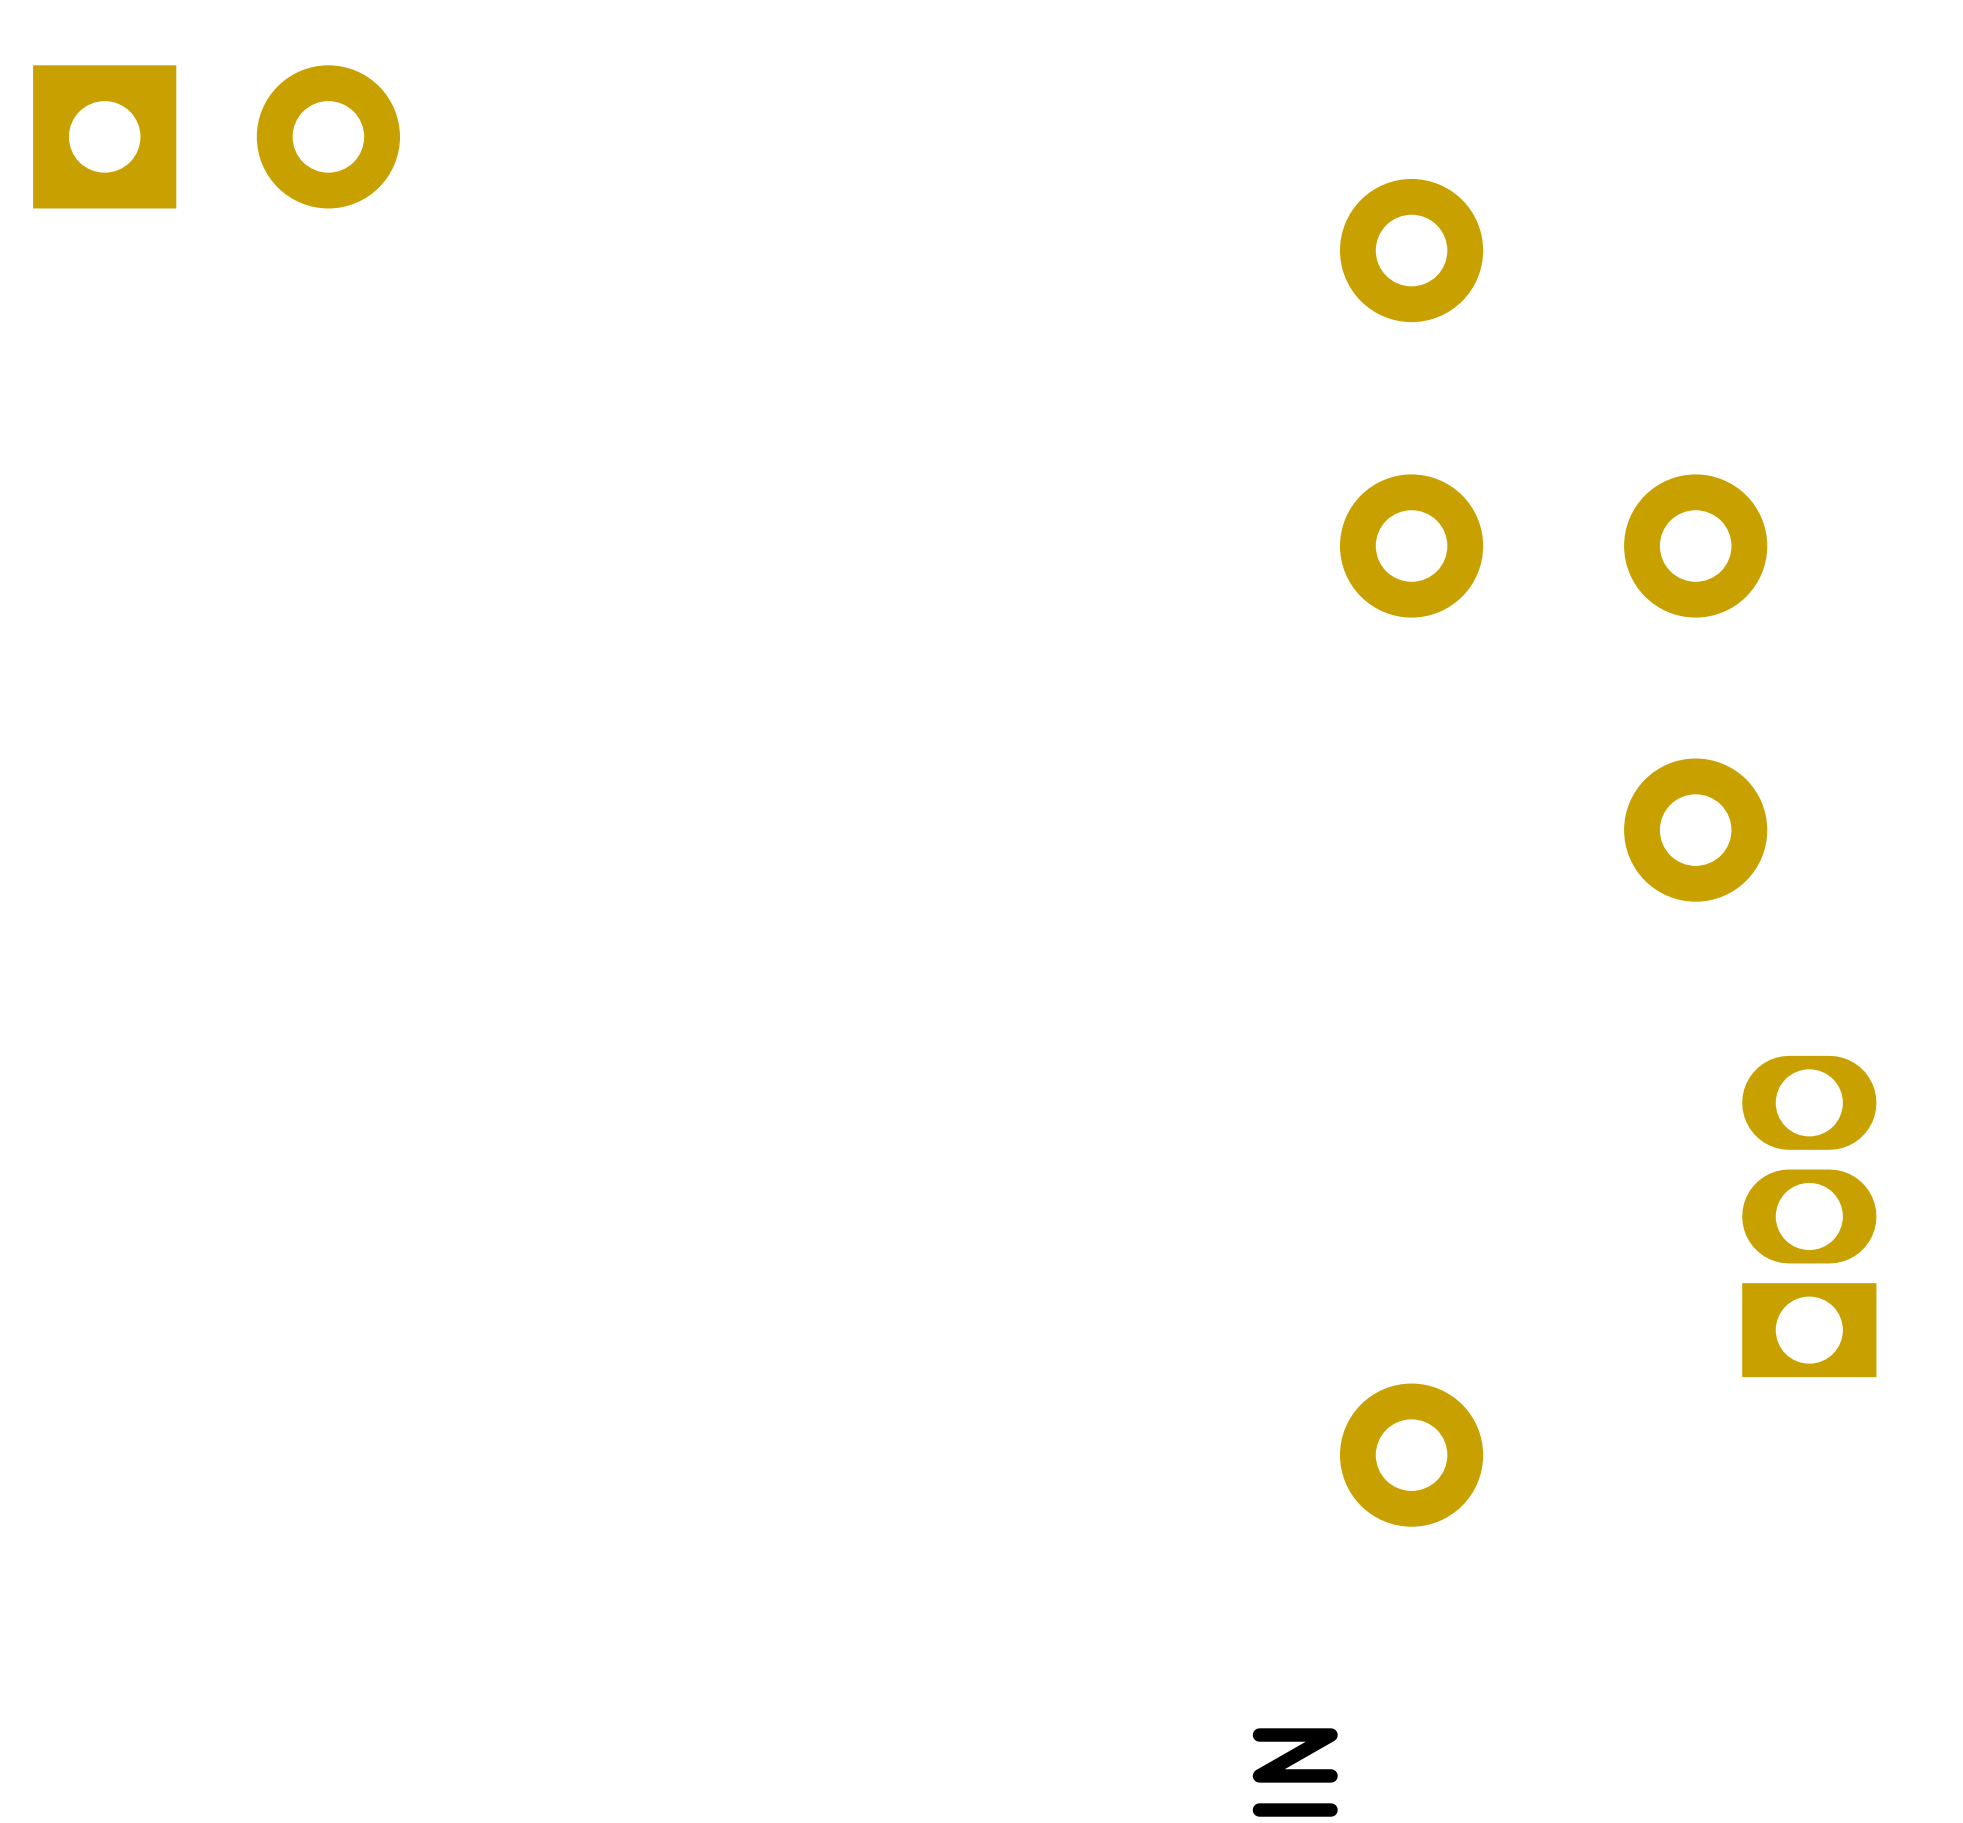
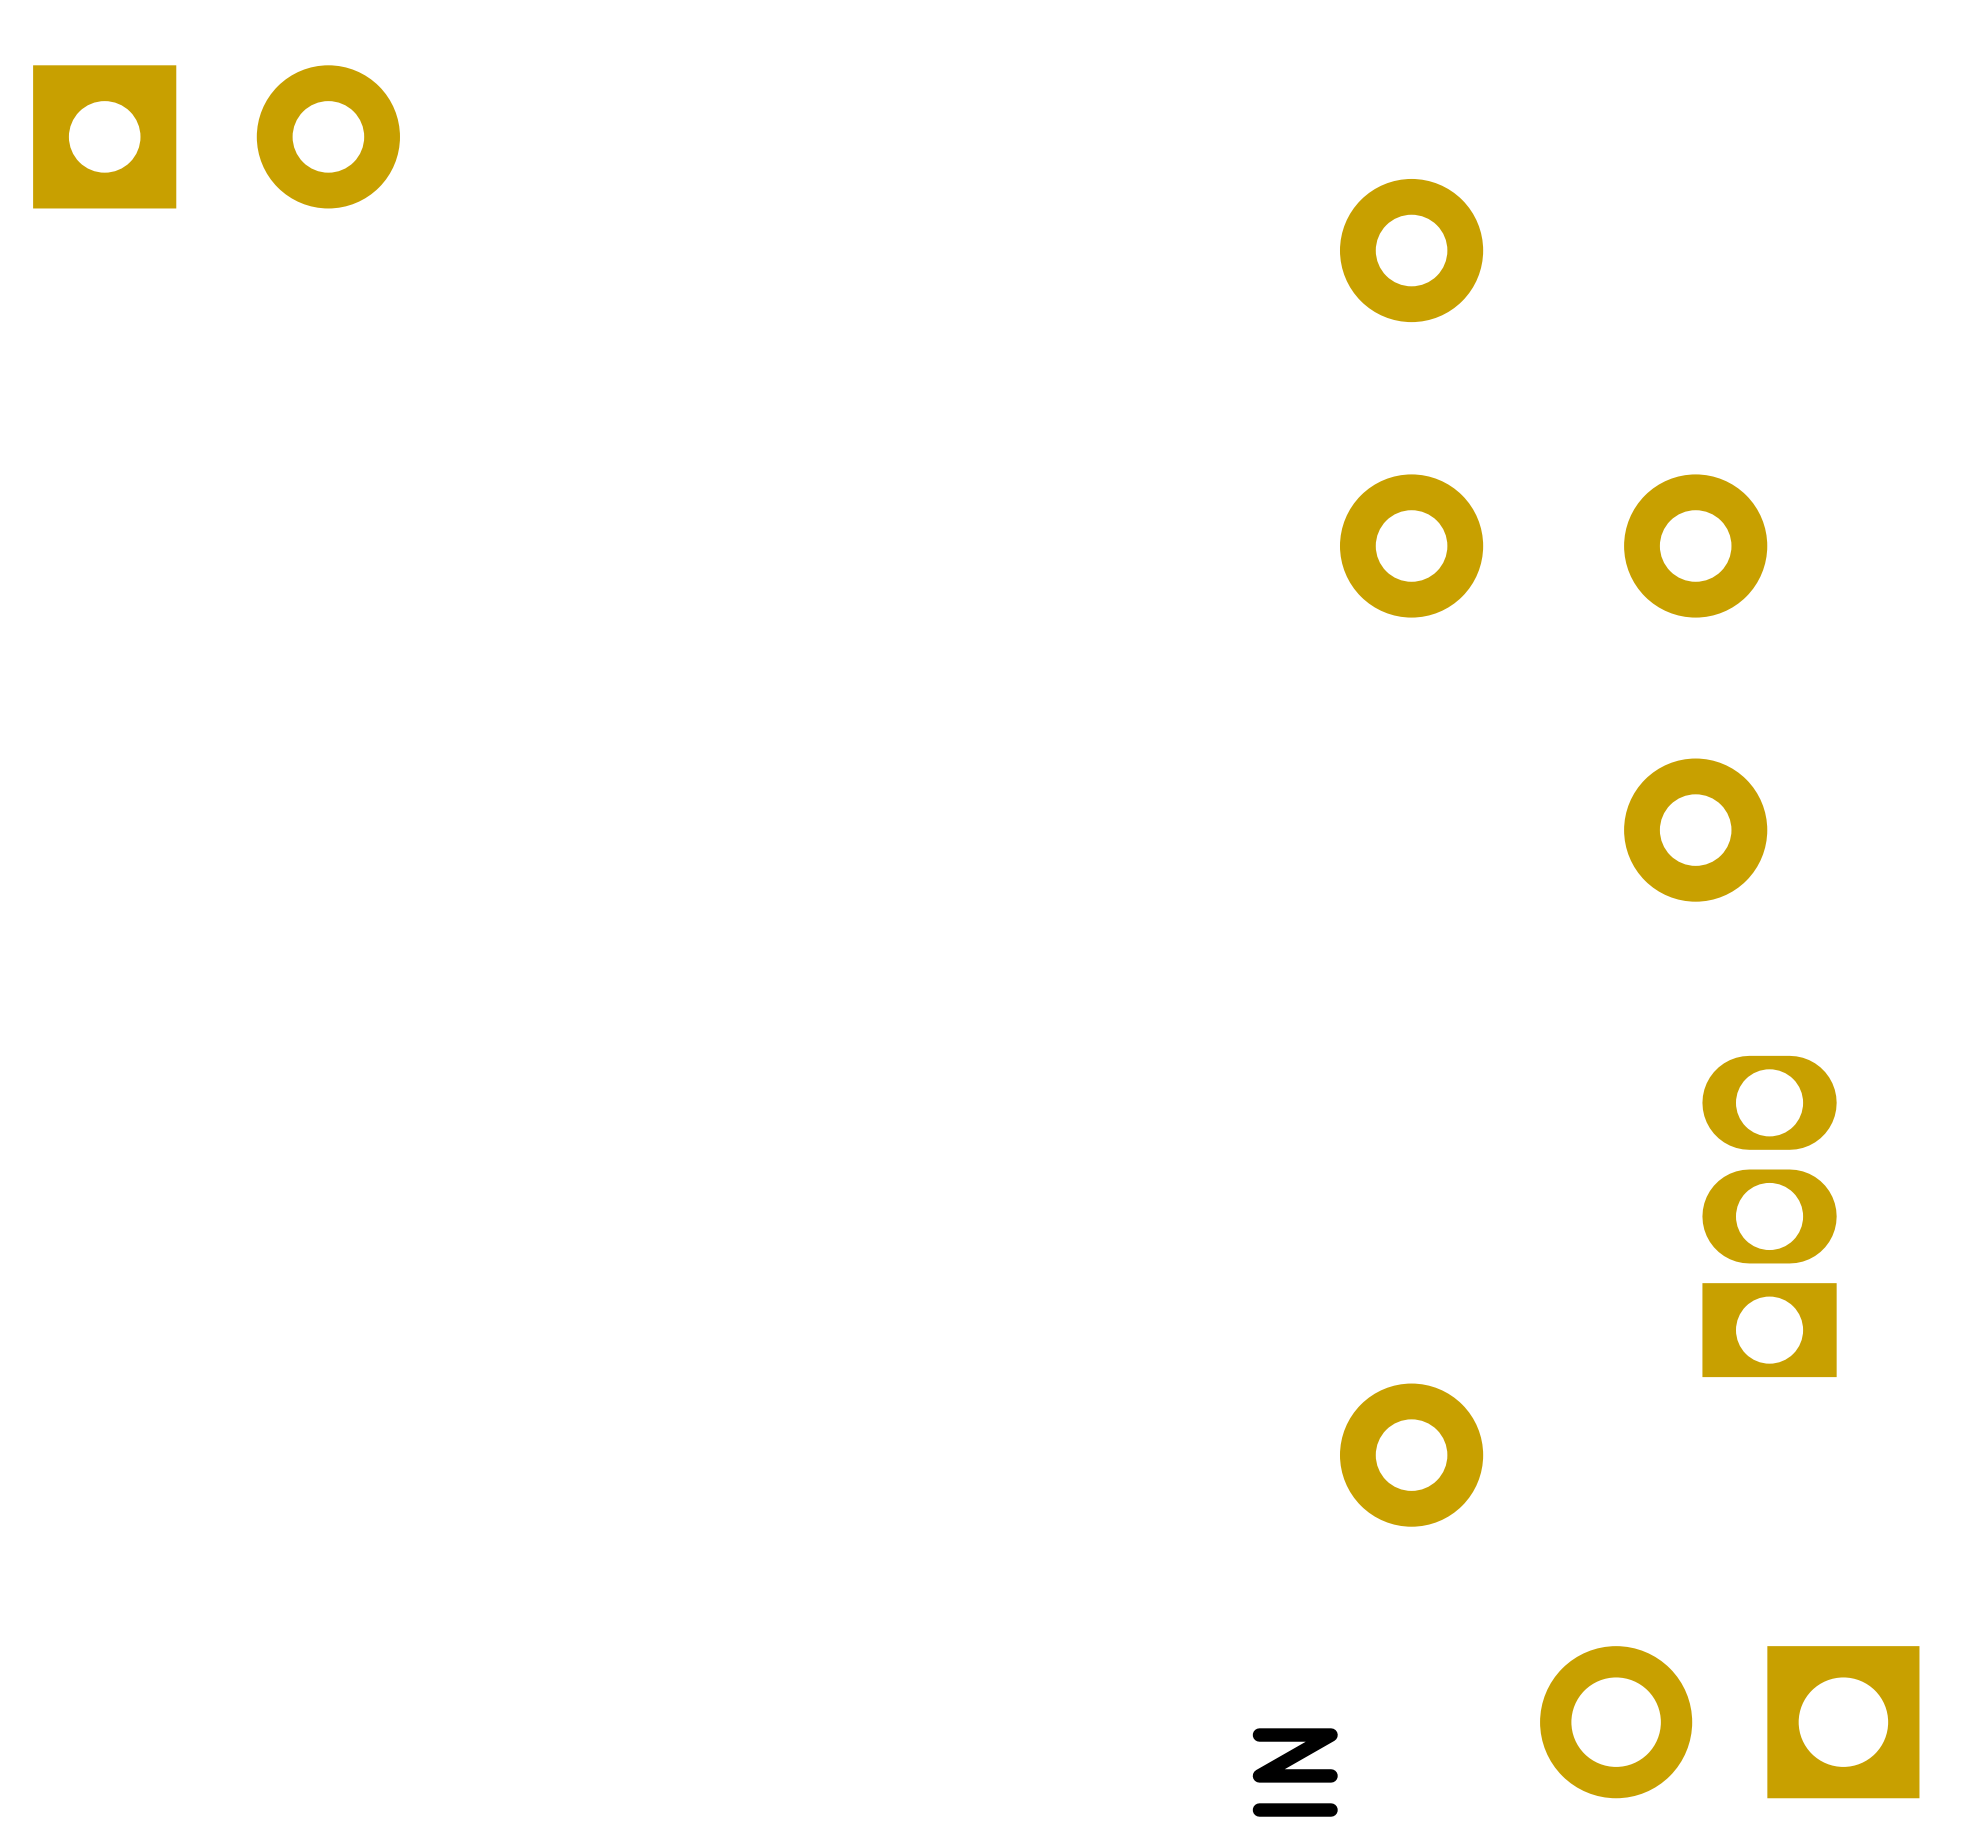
part position: (1809, 1216) -> (1769, 1216)
part: none -> (1729, 1722)

